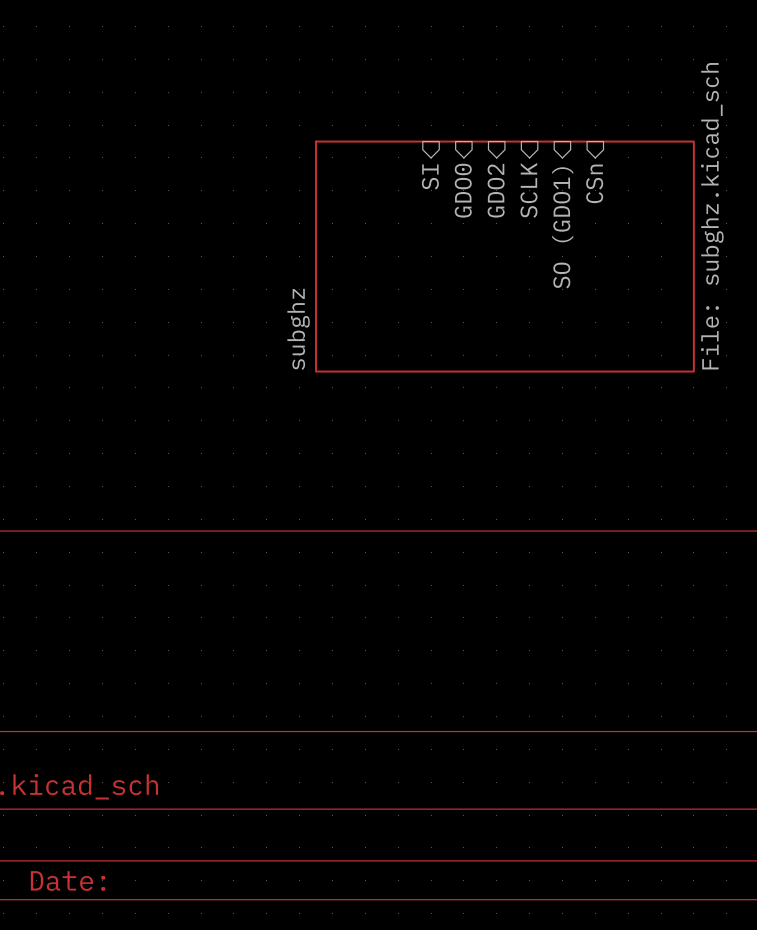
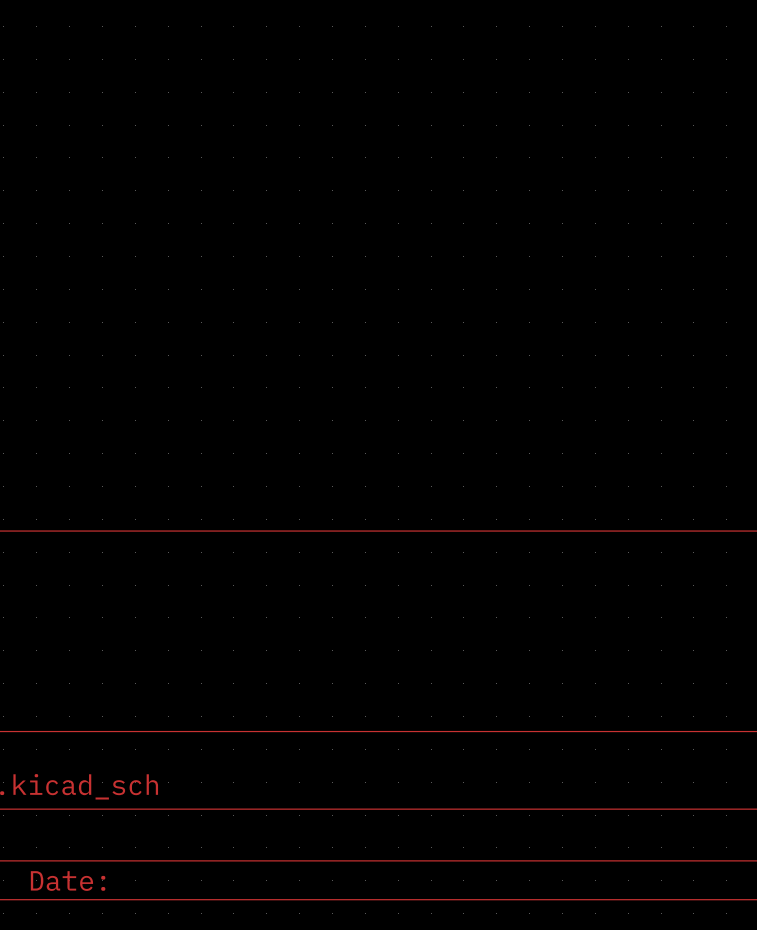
sheet pin: SI (430, 177) -> none
sheet pin: CSn (594, 183) -> none
sheet pin: GDO0 (463, 190) -> none
sheet pin: GDO2 (496, 190) -> none
sheet pin: SCLK (528, 190) -> none
sheet pin: SO (GDO1) (562, 227) -> none
sheet subghz: File: subghz.kicad_sch (504, 256) -> none

